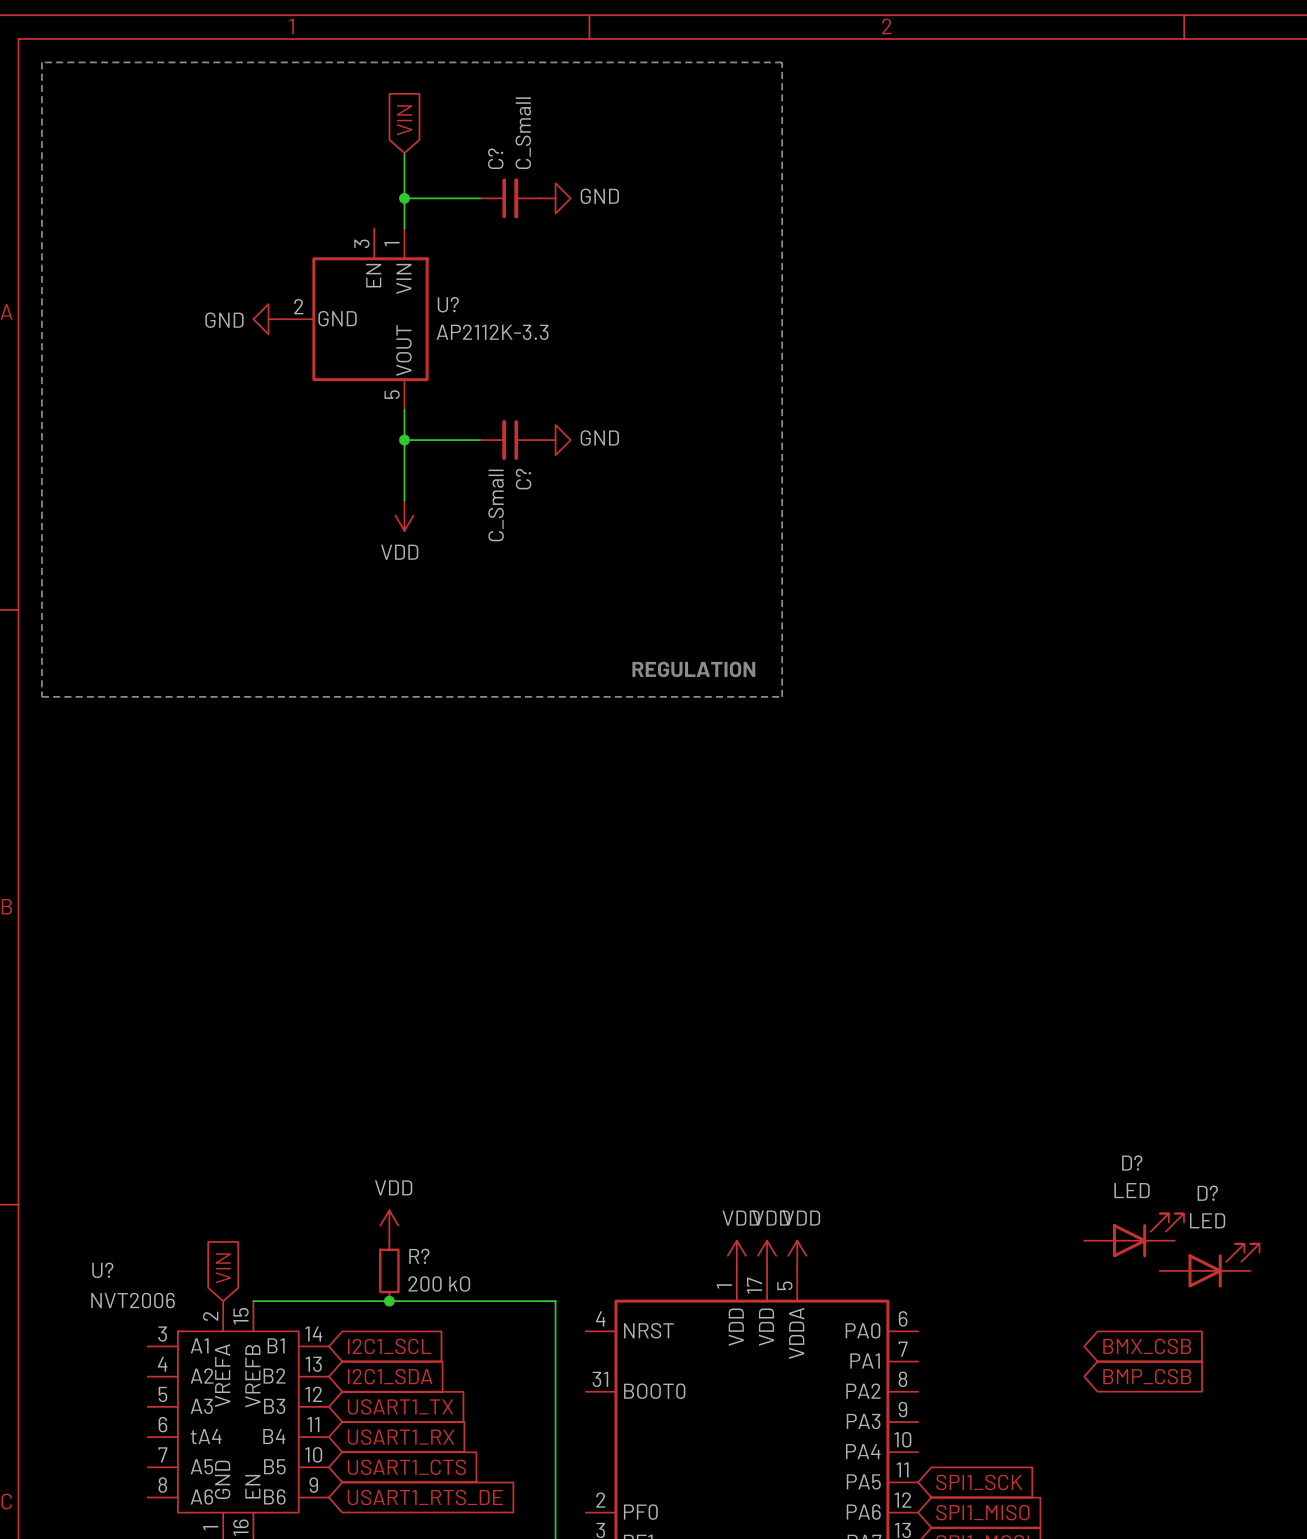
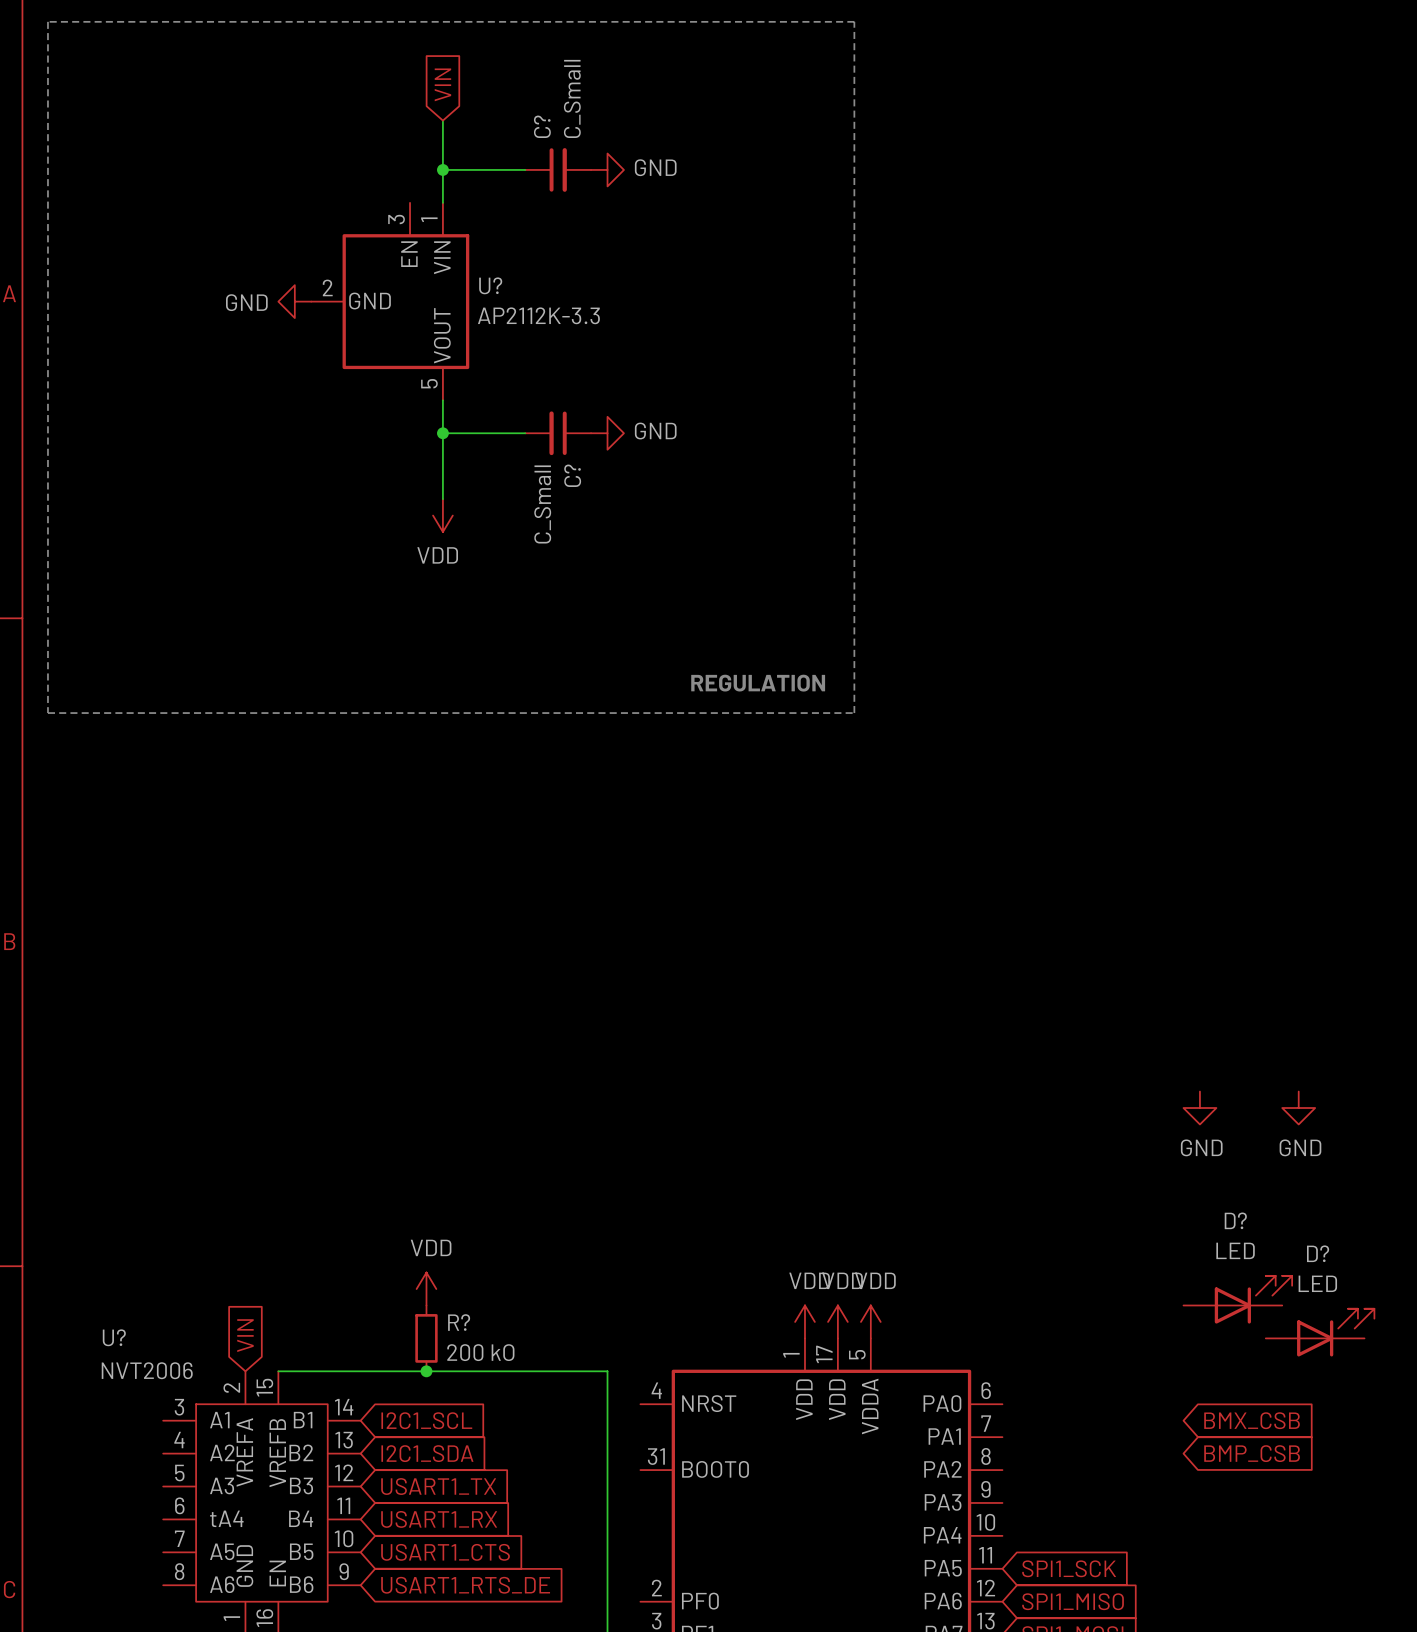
power symbol: none -> GND (1199, 1108)
power symbol: none -> GND (1298, 1108)

